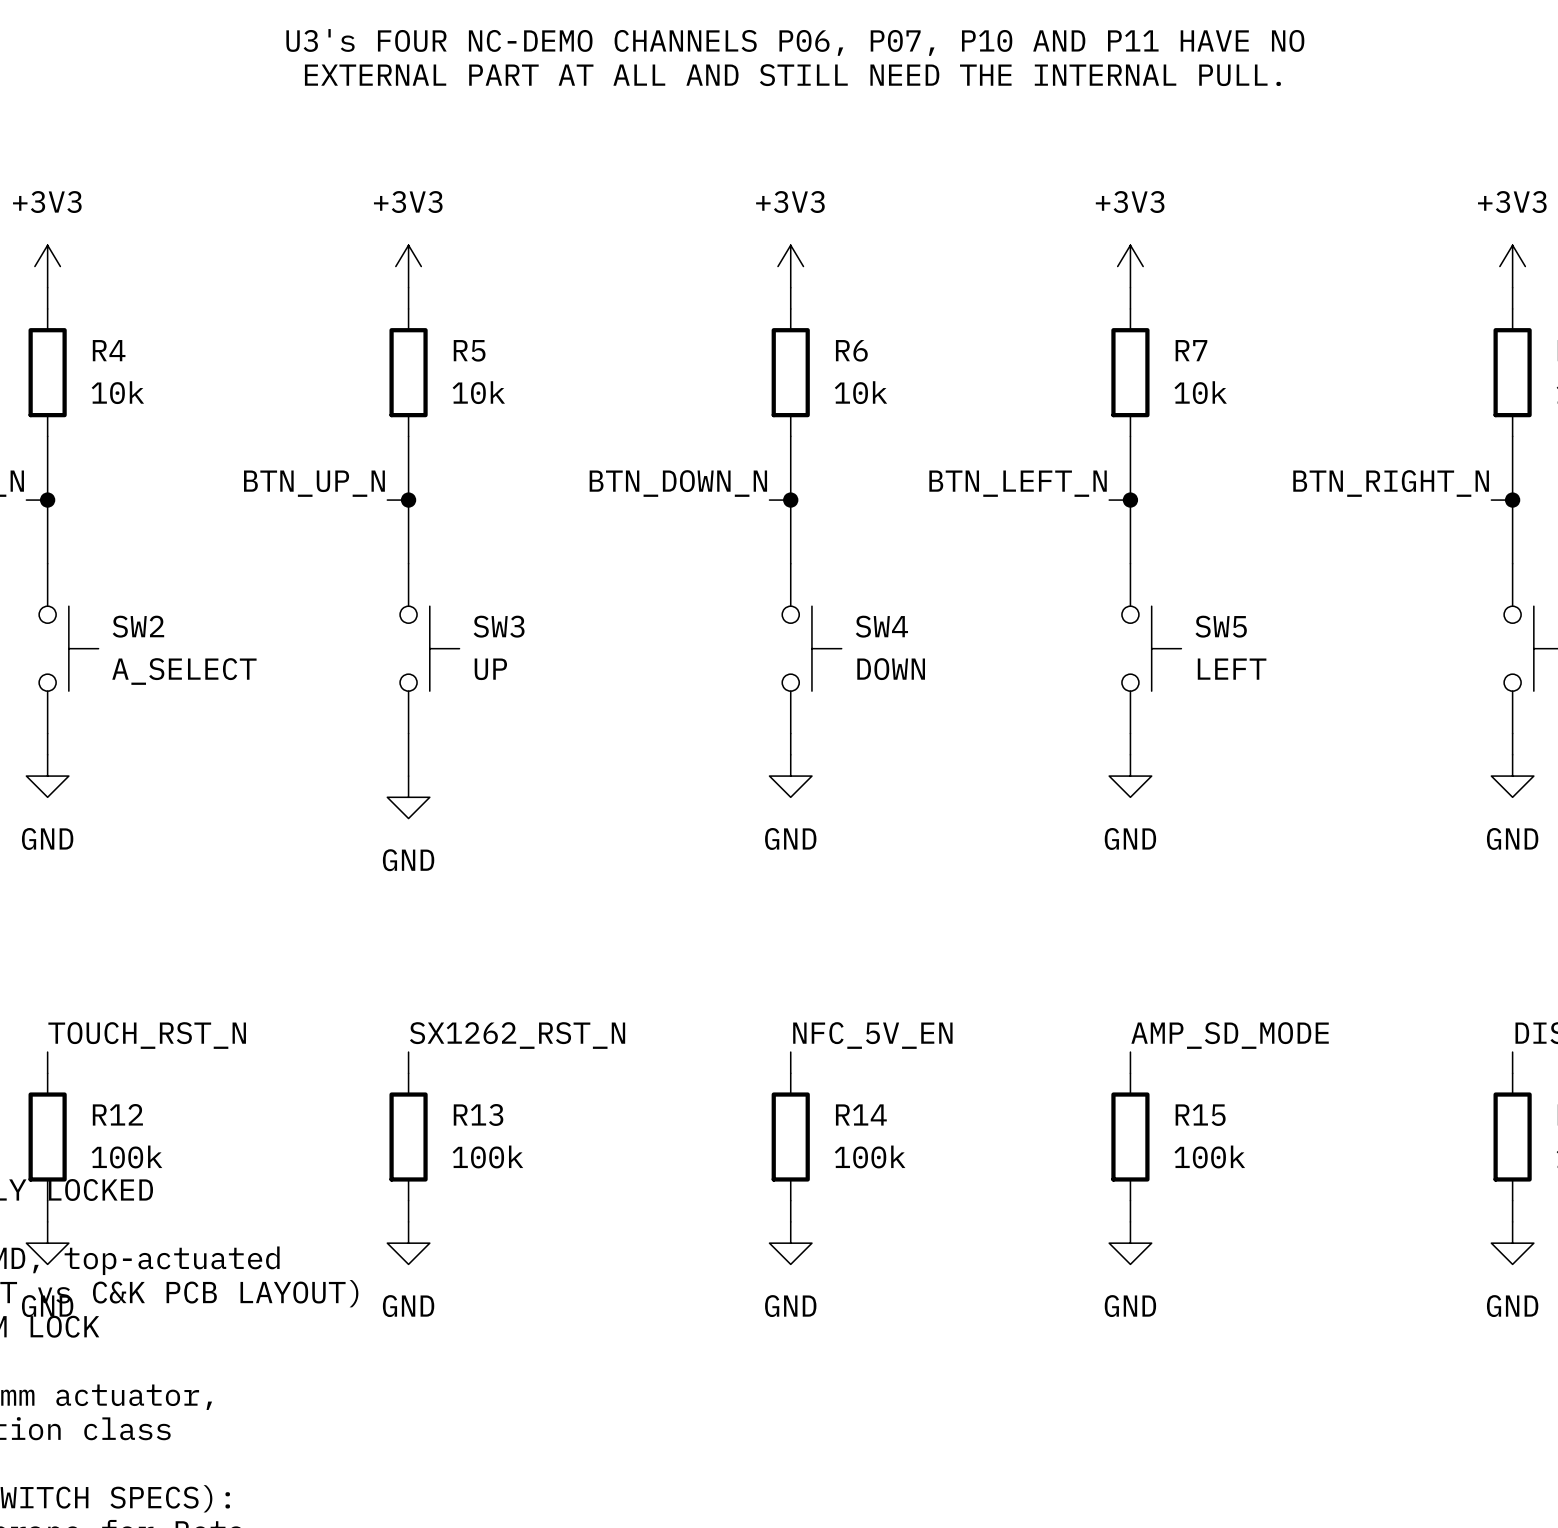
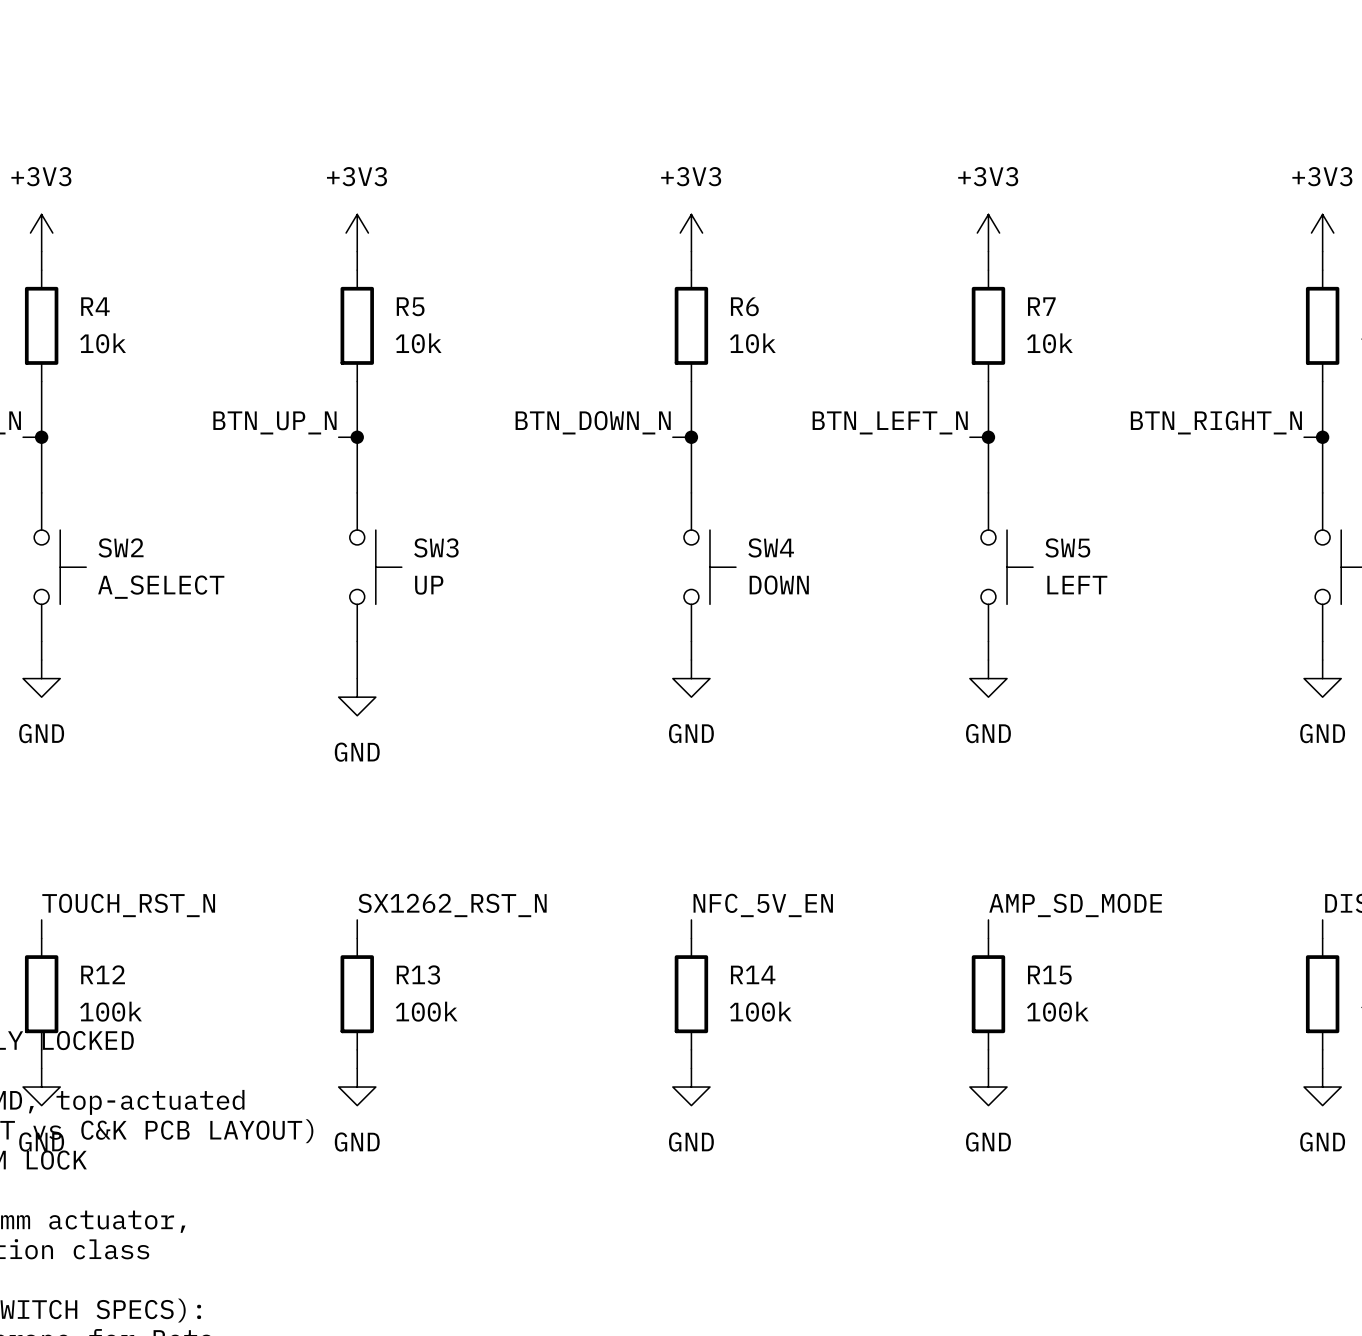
text: U3's FOUR NC-DEMO CHANNELS P06, P07, P10 AND P11 HAVE NO (795, 42) -> none
text: EXTERNAL PART AT ALL AND STILL NEED THE INTERNAL PULL. (792, 75) -> none

